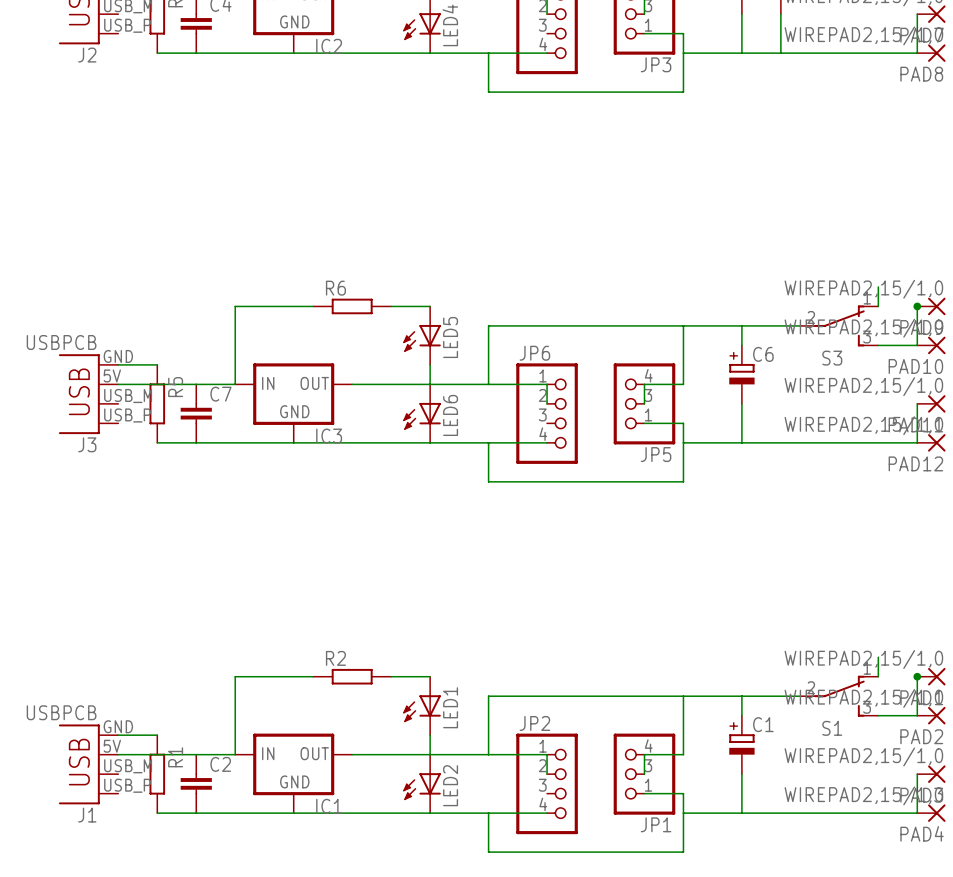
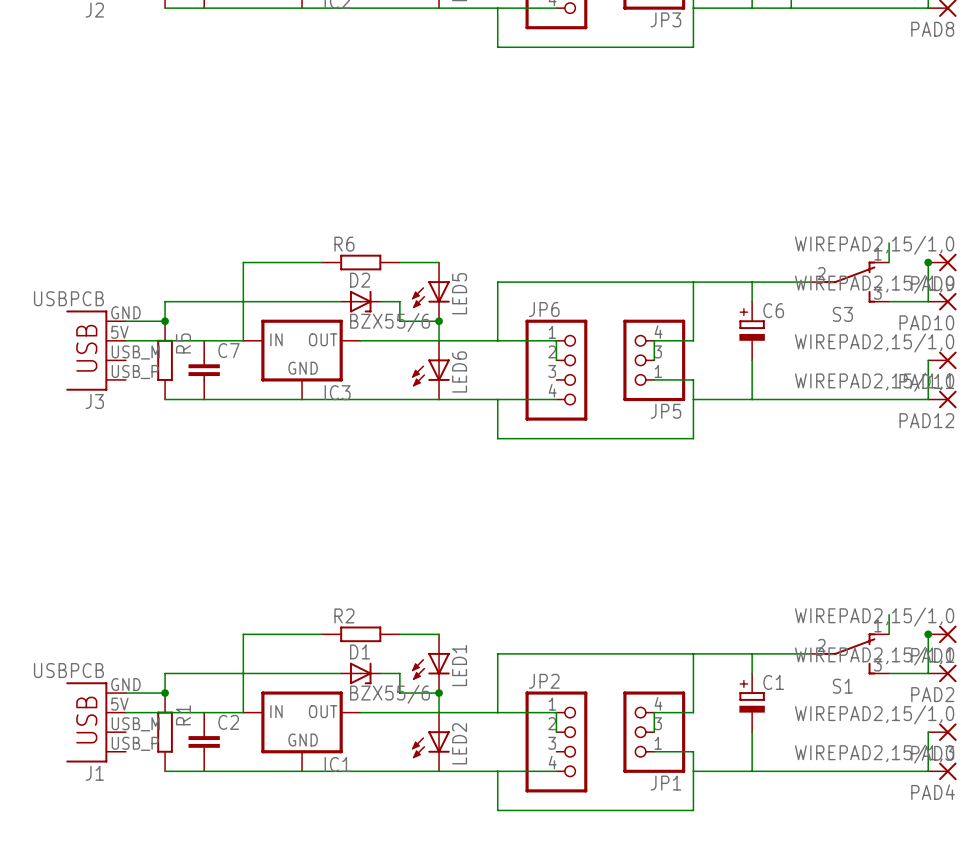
wire: none -> (341, 301) (165, 301) (165, 321)
D2: none -> BZX55/6 (360, 301)
wire: none -> (380, 301) (399, 301) (399, 321) (439, 321)
junction: none -> (165, 321)
junction: none -> (439, 321)
wire: none -> (341, 673) (165, 673) (165, 693)
D1: none -> BZX55/6 (360, 673)
wire: none -> (380, 673) (399, 673) (399, 693) (439, 693)
junction: none -> (165, 693)
junction: none -> (439, 693)

